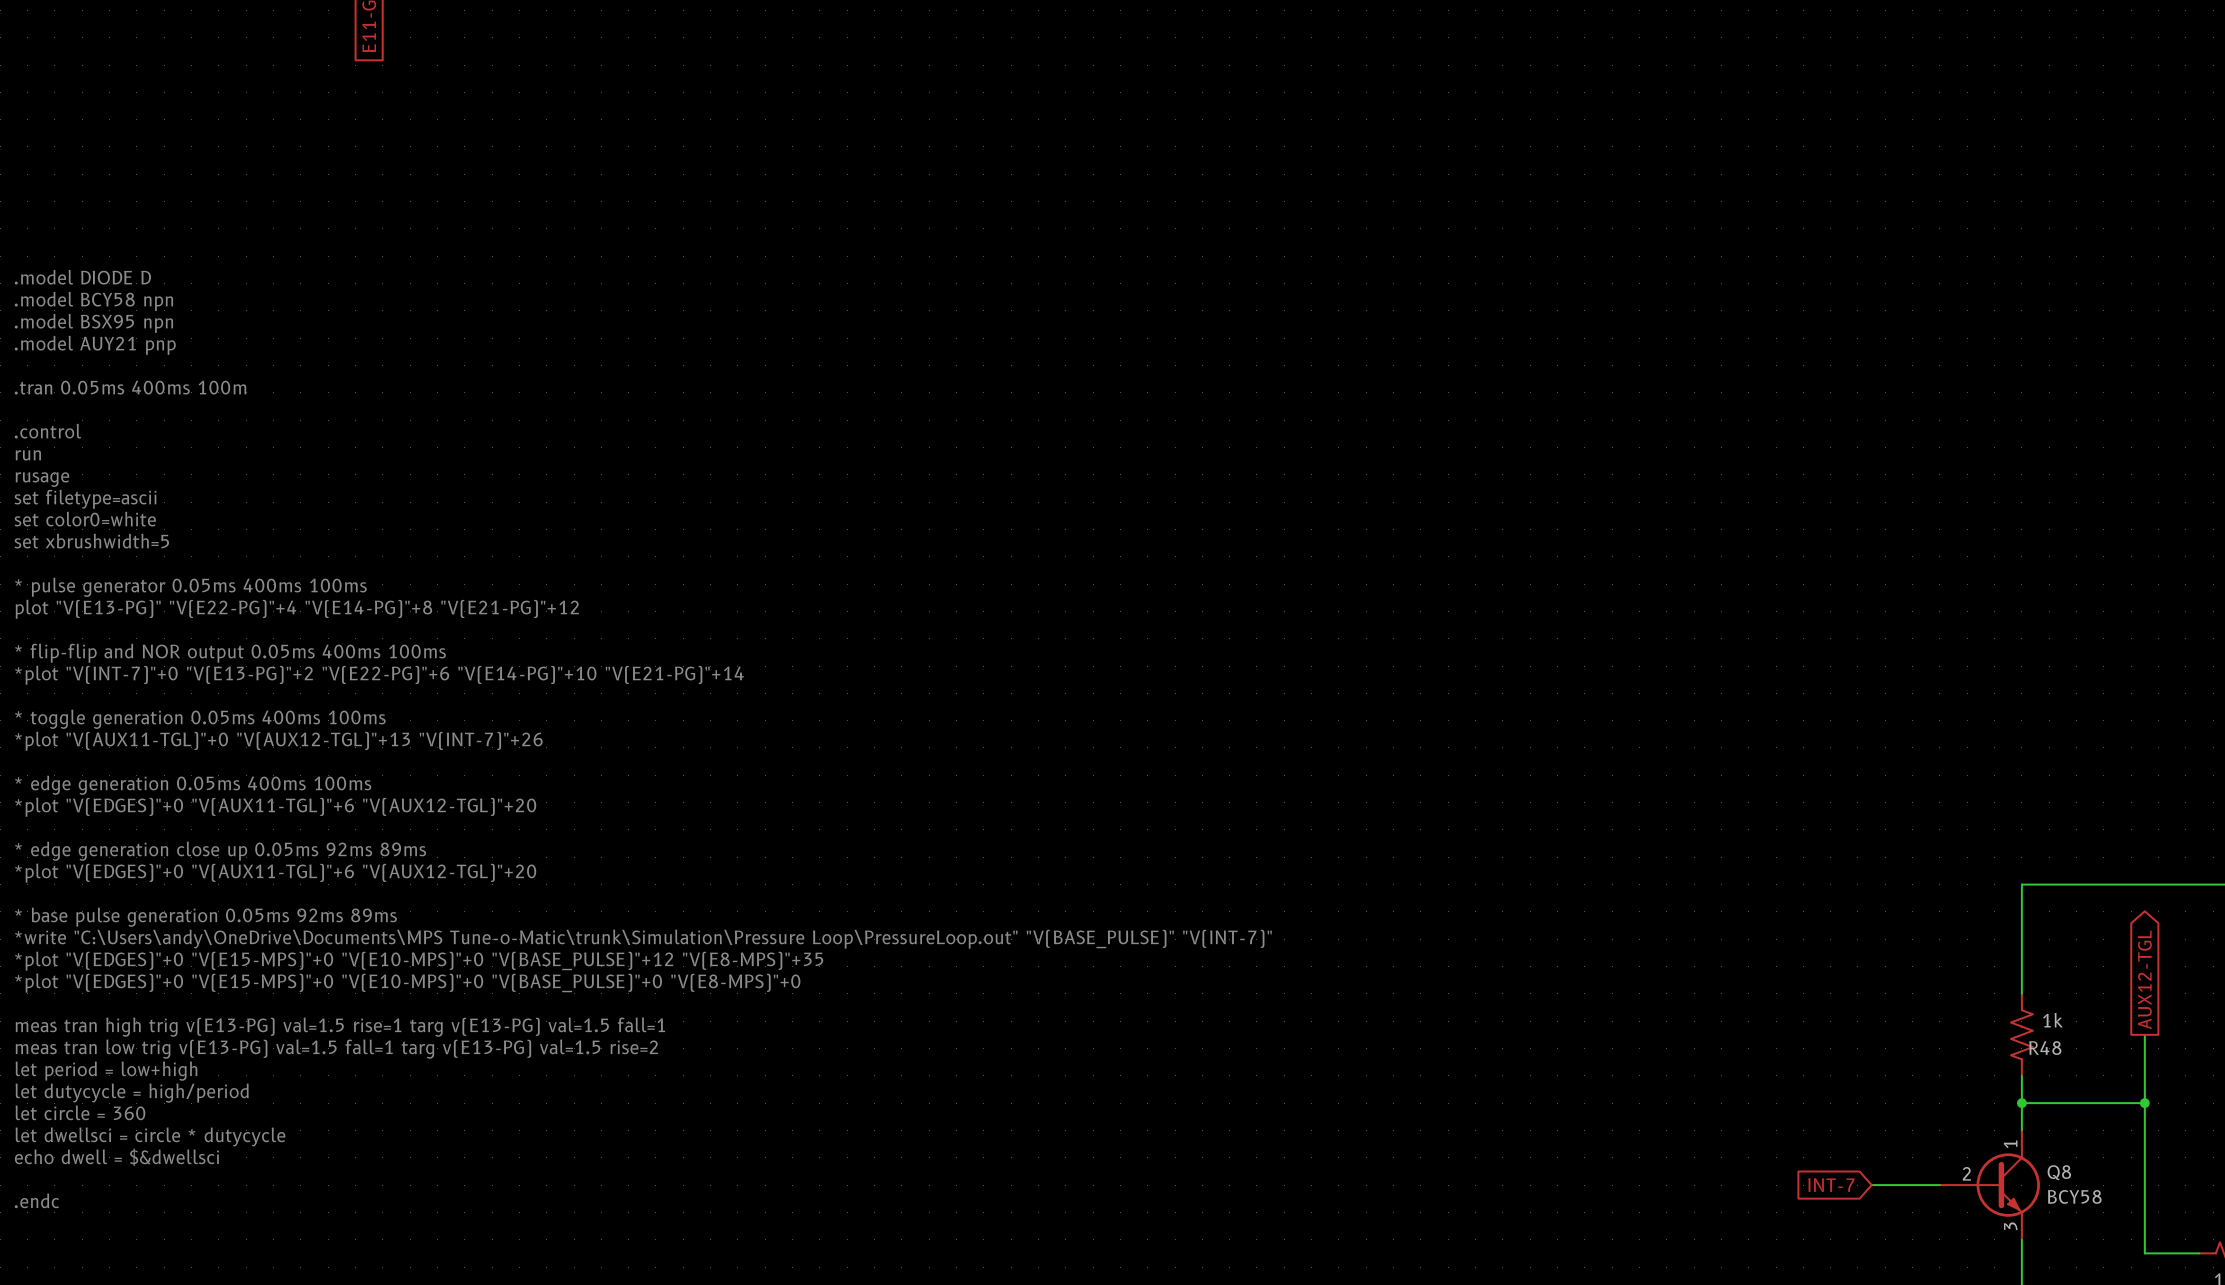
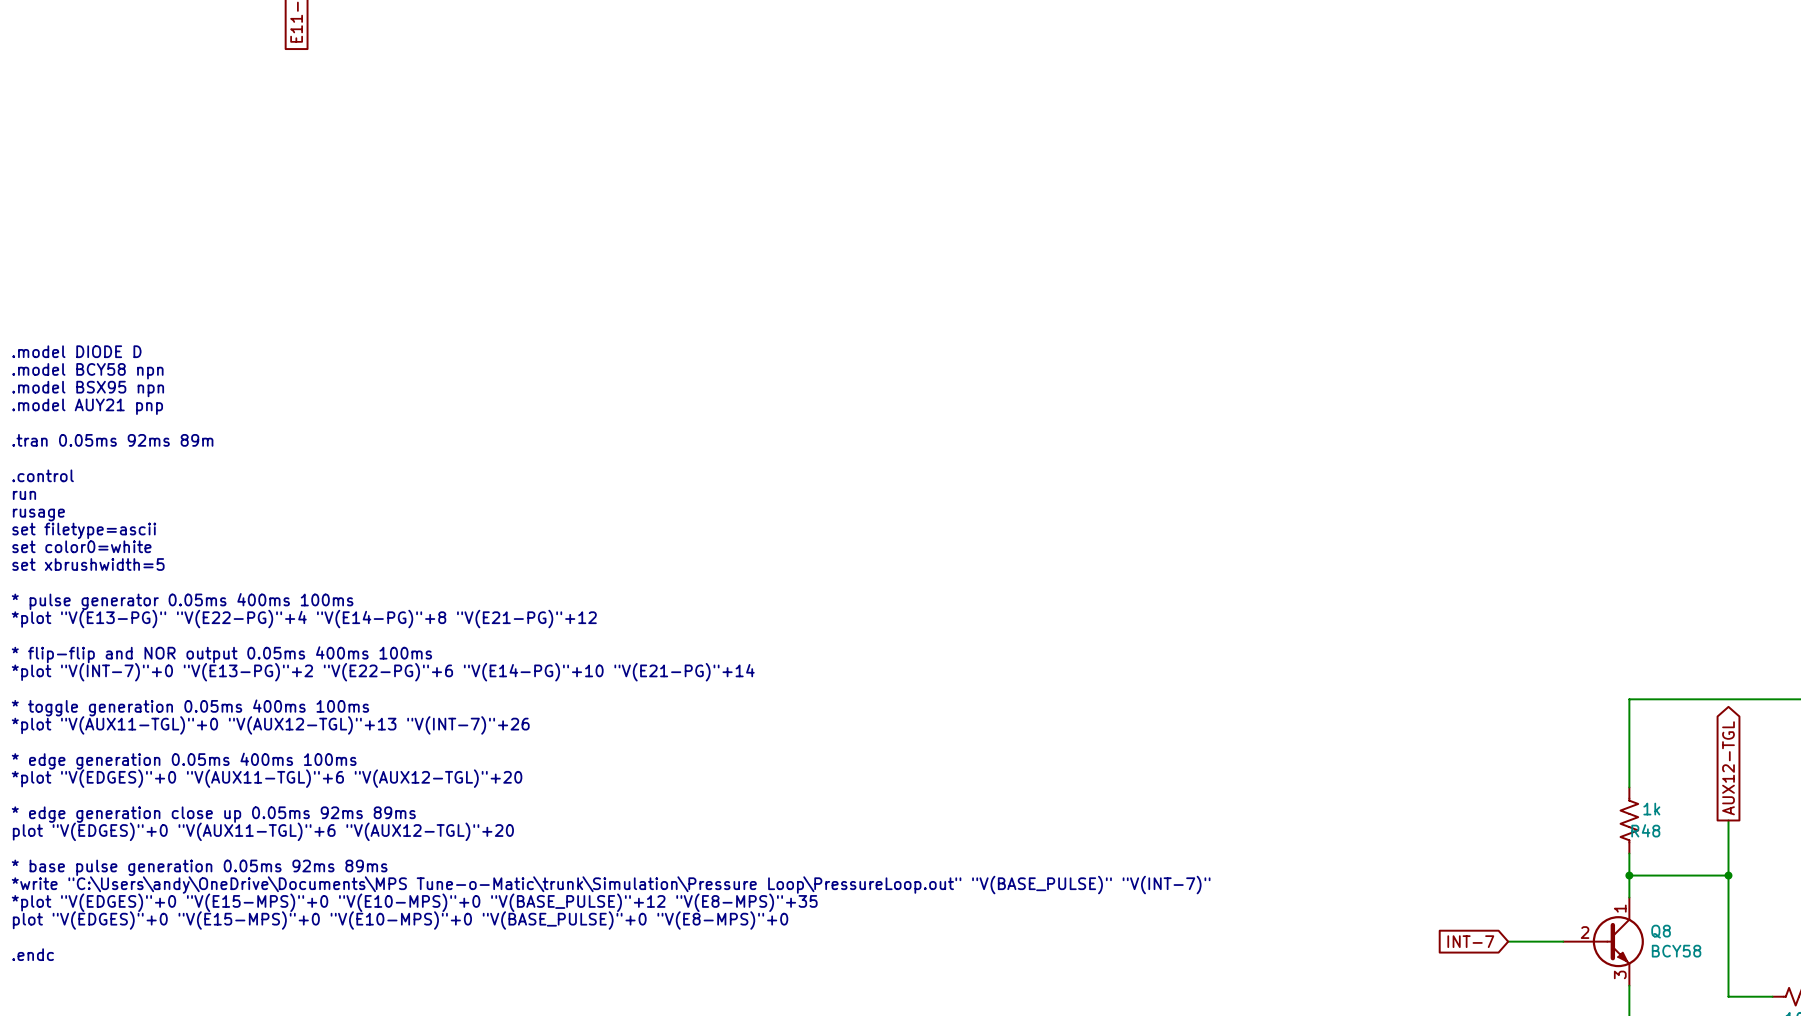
text: .model DIODE D (82, 277) -> none
text: .model BCY58 npn (93, 301) -> none
text: .model BSX95 npn (93, 323) -> none
text: .model AUY21 pnp (95, 345) -> none
text: .tran 0.05ms 400ms 100m (130, 387) -> none
text: .control (47, 431) -> none
text: run (28, 455) -> .model DIODE D (76, 351)
text: rusage (42, 479) -> .model BCY58 npn (87, 371)
text: set filetype=ascii (85, 499) -> .model BSX95 npn (88, 389)
text: set color0=white (85, 519) -> .model AUY21 pnp (87, 406)
text: set xbrushwidth=5 (91, 541) -> none
text: none -> .tran 0.05ms 92ms 89m (112, 440)
text position: * pulse generator 0.05ms 400ms 100ms (190, 587) -> * pulse generator 0.05ms 400ms 100ms (182, 601)
text: plot "V(E13-PG)" "V(E22-PG)"+4 "V(E14-PG)"+8 "V(E21-PG)"+12 (297, 609) -> .control (43, 475)
text: none -> run (24, 495)
text: * flip-flip and NOR output 0.05ms 400ms 100ms (230, 653) -> rusage (38, 514)
text: *plot "V(INT-7)"+0 "V(E13-PG)"+2 "V(E22-PG)"+6 "V(E14-PG)"+10 "V(E21-PG)"+14 (379, 675) -> set filetype=ascii (84, 530)
text: none -> set color0=white (81, 546)
text: * toggle generation 0.05ms 400ms 100ms (200, 719) -> set xbrushwidth=5 (88, 564)
text: *plot "V(AUX11-TGL)"+0 "V(AUX12-TGL)"+13 "V(INT-7)"+26 (278, 741) -> none
text: * edge generation 0.05ms 400ms 100ms (193, 785) -> *plot "V(E13-PG)" "V(E22-PG)"+4 "V(E14-PG)"+8 "V(E21-PG)"+12 (304, 619)
text: *plot "V(EDGES)"+0 "V(AUX11-TGL)"+6 "V(AUX12-TGL)"+20 (275, 807) -> none
text: none -> * flip-flip and NOR output 0.05ms 400ms 100ms (221, 654)
text: * edge generation close up 0.05ms 92ms 89ms (220, 851) -> *plot "V(INT-7)"+0 "V(E13-PG)"+2 "V(E22-PG)"+6 "V(E14-PG)"+10 "V(E21-PG)"+14 (383, 672)
text: *plot "V(EDGES)"+0 "V(AUX11-TGL)"+6 "V(AUX12-TGL)"+20 (275, 873) -> none
text: none -> * toggle generation 0.05ms 400ms 100ms (190, 707)
text: * base pulse generation 0.05ms 92ms 89ms (206, 917) -> *plot "V(AUX11-TGL)"+0 "V(AUX12-TGL)"+13 "V(INT-7)"+26 (270, 725)
text: *write "C:\Users\andy\OneDrive\Documents\MPS Tune-o-Matic\trunk\Simulation\Pressure Loop\PressureLoop.out" "V(BASE_PULSE)" "V(INT-7)" (643, 939) -> none
text: *plot "V(EDGES)"+0 "V(E15-MPS)"+0 "V(E10-MPS)"+0 "V(BASE_PULSE)"+12 "V(E8-MPS)"+35 (419, 961) -> * edge generation 0.05ms 400ms 100ms (184, 761)
text: *plot "V(EDGES)"+0 "V(E15-MPS)"+0 "V(E10-MPS)"+0 "V(BASE_PULSE)"+0 "V(E8-MPS)"+0 (407, 983) -> *plot "V(EDGES)"+0 "V(AUX11-TGL)"+6 "V(AUX12-TGL)"+20 (267, 778)
text: meas tran high trig v(E13-PG) val=1.5 rise=1 targ v(E13-PG) val=1.5 fall=1 (340, 1027) -> * edge generation close up 0.05ms 92ms 89ms (213, 814)
text: meas tran low trig v(E13-PG) val=1.5 fall=1 targ v(E13-PG) val=1.5 rise=2 (336, 1049) -> plot "V(EDGES)"+0 "V(AUX11-TGL)"+6 "V(AUX12-TGL)"+20 (263, 831)
text: let period = low+high (106, 1071) -> none
text: let dutycycle = high/period (132, 1093) -> * base pulse generation 0.05ms 92ms 89ms (199, 867)
text: let circle = 360 (80, 1112) -> *write "C:\Users\andy\OneDrive\Documents\MPS Tune-o-Matic\trunk\Simulation\Pressure Loop\PressureLoop.out" "V(BASE_PULSE)" "V(INT-7)" (611, 885)
text: let dwellsci = circle * dutycycle (150, 1136) -> *plot "V(EDGES)"+0 "V(E15-MPS)"+0 "V(E10-MPS)"+0 "V(BASE_PULSE)"+12 "V(E8-MPS)"+35 (414, 902)
text: echo dwell = $&dwellsci (116, 1157) -> plot "V(EDGES)"+0 "V(E15-MPS)"+0 "V(E10-MPS)"+0 "V(BASE_PULSE)"+0 "V(E8-MPS)"+0 (400, 920)

